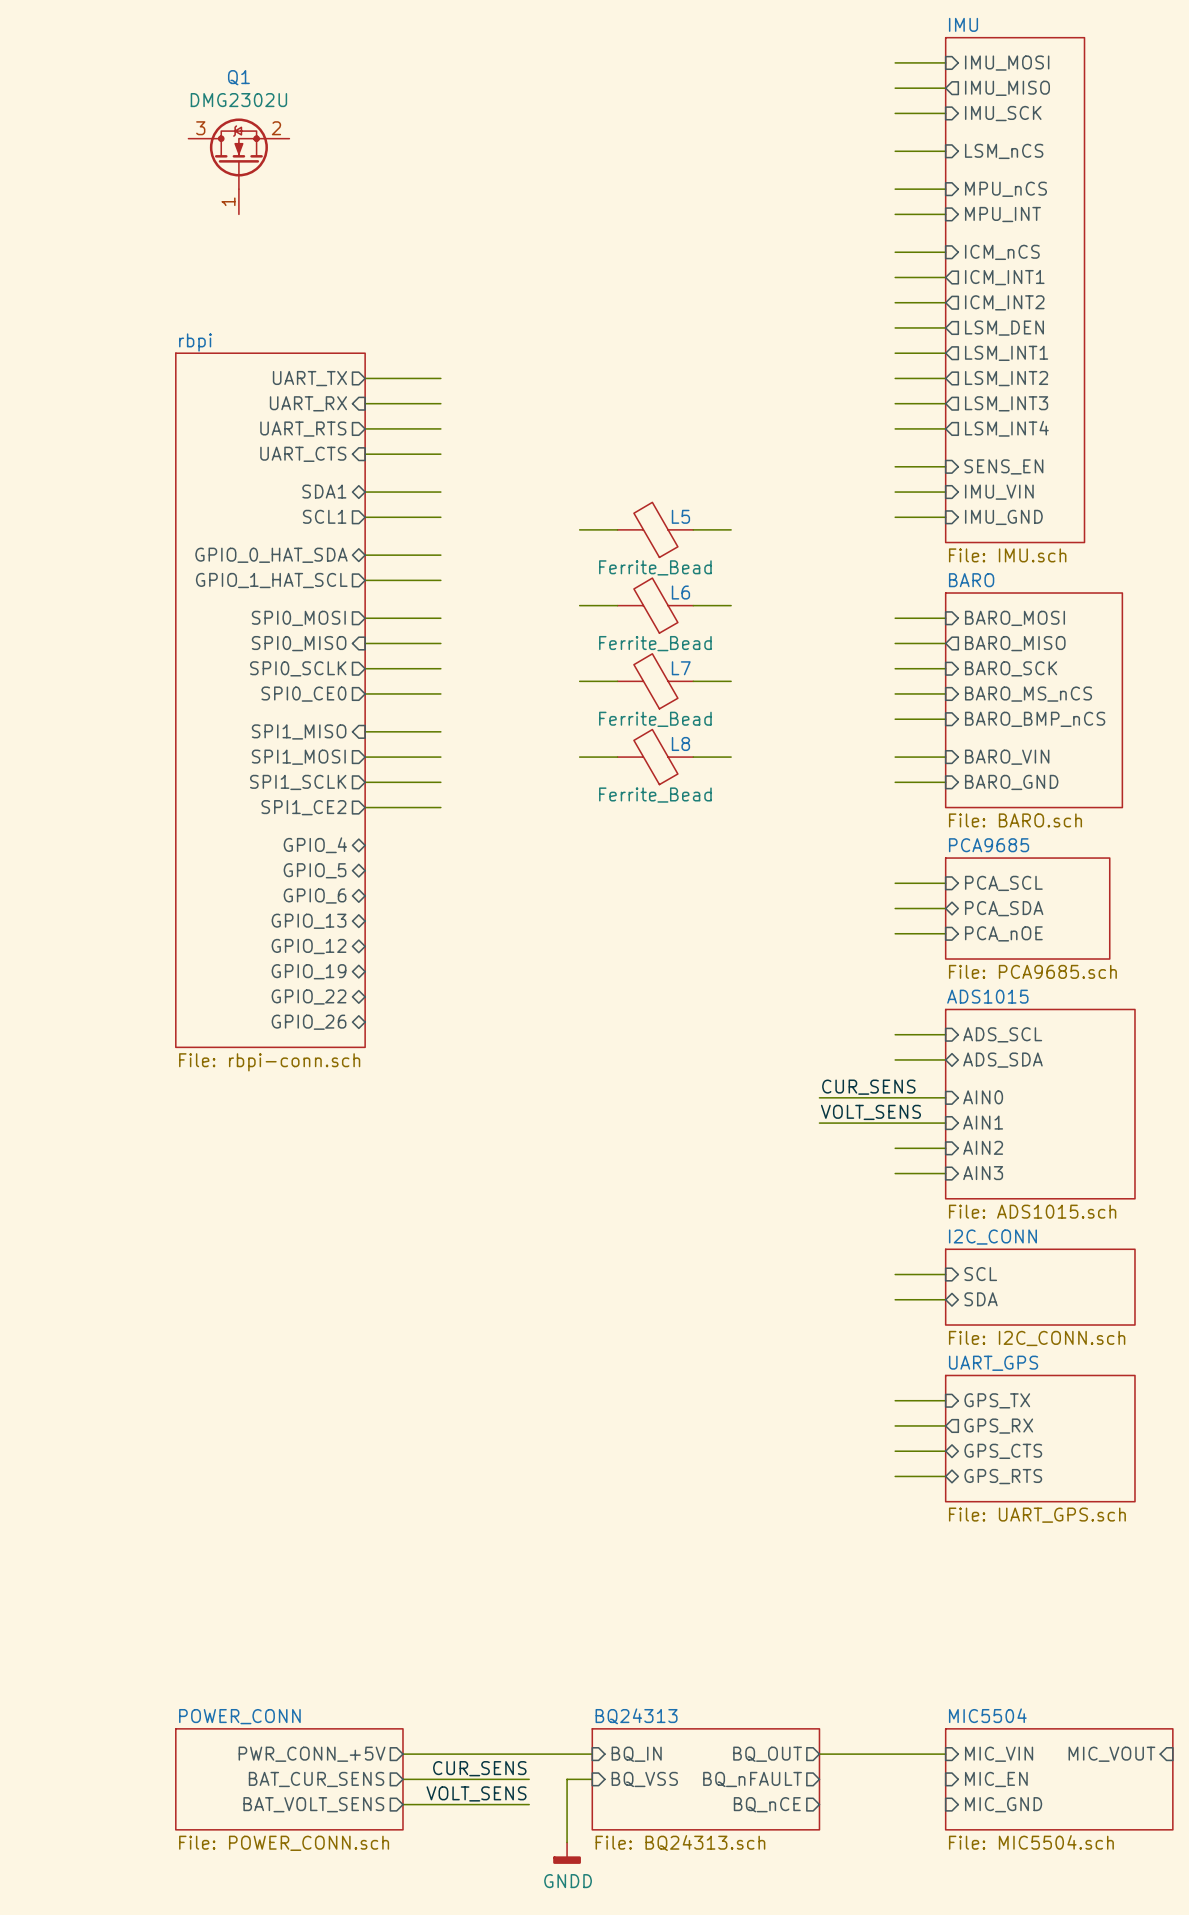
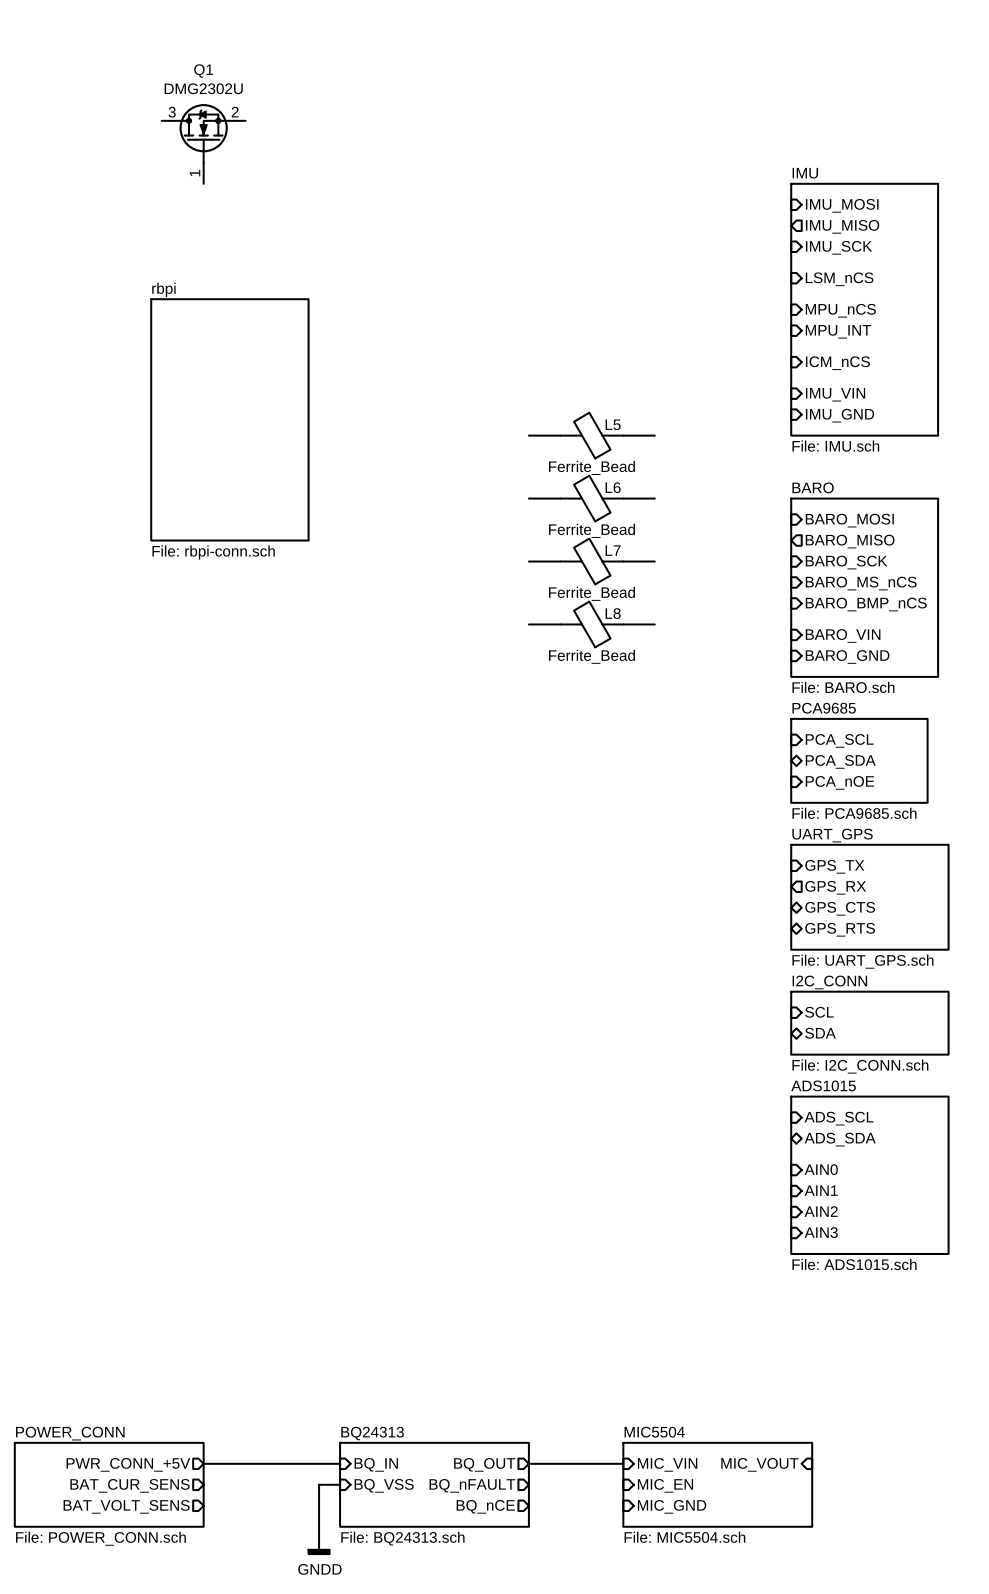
wire: (895, 62) (945, 62) -> none
sheet pin position: IMU_MOSI (1007, 63) -> IMU_MOSI (842, 205)
wire: (895, 88) (945, 88) -> none
sheet pin position: IMU_MISO (1007, 88) -> IMU_MISO (842, 226)
wire: (895, 113) (945, 113) -> none
sheet pin position: IMU_SCK (1003, 113) -> IMU_SCK (839, 247)
wire: (895, 151) (945, 151) -> none
sheet pin: LSM_nCS (1004, 151) -> none
wire: (895, 189) (945, 189) -> none
sheet pin position: MPU_nCS (1005, 189) -> MPU_nCS (840, 310)
wire: (895, 214) (945, 214) -> none
sheet pin position: MPU_INT (1002, 214) -> MPU_INT (838, 331)
wire: (895, 252) (945, 252) -> none
sheet pin: ICM_nCS (1002, 252) -> none
wire: (895, 277) (945, 277) -> none
sheet pin: ICM_INT1 (1004, 277) -> none
sheet IMU: File: IMU.sch (1015, 290) -> none
wire: (895, 302) (945, 302) -> none
sheet pin: ICM_INT2 (1004, 302) -> none
wire: (895, 327) (945, 327) -> none
sheet pin shape: output (1004, 328) -> input (839, 279)
sheet pin: LSM_DEN (1004, 328) -> LSM_nCS (839, 279)
wire: (895, 353) (945, 353) -> none
sheet pin: LSM_INT1 (1006, 353) -> none
sheet IMU: none -> File: IMU.sch (864, 309)
sheet pin: UART_TX (309, 378) -> none
wire: (365, 378) (440, 378) -> none
wire: (895, 378) (945, 378) -> none
sheet pin: LSM_INT2 (1006, 378) -> none
sheet pin: UART_RX (308, 403) -> none
wire: (365, 403) (440, 403) -> none
wire: (895, 403) (945, 403) -> none
sheet pin: LSM_INT3 (1006, 403) -> none
wire: (365, 428) (440, 428) -> none
wire: (895, 428) (945, 428) -> none
sheet pin shape: output (1006, 428) -> input (837, 363)
sheet pin: LSM_INT4 (1006, 428) -> ICM_nCS (837, 363)
sheet pin: UART_RTS (303, 429) -> none
sheet pin: UART_CTS (303, 454) -> none
wire: (365, 454) (440, 454) -> none
wire: (895, 466) (945, 466) -> none
sheet pin: SENS_EN (1003, 466) -> IMU_VIN (835, 394)
sheet pin: SDA1 (324, 491) -> none
wire: (365, 492) (440, 492) -> none
wire: (895, 492) (945, 492) -> none
sheet pin: IMU_VIN (999, 492) -> IMU_GND (840, 415)
sheet rbpi: none -> File: rbpi-conn.sch (229, 419)
sheet pin: SCL1 (324, 516) -> none
wire: (365, 517) (440, 517) -> none
wire: (895, 517) (945, 517) -> none
sheet pin: IMU_GND (1003, 517) -> none
wire: (579, 529) (617, 529) -> (528, 435) (560, 435)
L5 position: (655, 529) -> (591, 435)
wire: (693, 529) (731, 529) -> (623, 435) (654, 435)
sheet pin: GPIO_0_HAT_SDA (271, 555) -> none
wire: (365, 555) (440, 555) -> none
sheet pin: GPIO_1_HAT_SCL (271, 580) -> none
wire: (365, 580) (440, 580) -> none
wire: (579, 605) (617, 605) -> (528, 498) (560, 498)
L6 position: (655, 605) -> (591, 498)
wire: (693, 605) (731, 605) -> (623, 498) (654, 498)
sheet pin: SPI0_MOSI (298, 618) -> none
wire: (365, 618) (440, 618) -> none
wire: (895, 618) (945, 618) -> none
sheet pin: SPI0_MISO (299, 643) -> none
wire: (365, 643) (440, 643) -> none
wire: (895, 643) (945, 643) -> none
sheet pin: SPI0_SCLK (298, 668) -> none
wire: (365, 668) (440, 668) -> none
wire: (895, 668) (945, 668) -> none
wire: (579, 681) (617, 681) -> (528, 561) (560, 561)
L7 position: (655, 681) -> (591, 561)
wire: (693, 681) (731, 681) -> (623, 561) (654, 561)
wire: (365, 693) (440, 693) -> none
wire: (895, 693) (945, 693) -> none
sheet pin: SPI0_CE0 (303, 694) -> none
sheet rbpi: File: rbpi-conn.sch (270, 700) -> none
wire: (895, 719) (945, 719) -> none
sheet pin: SPI1_MISO (299, 731) -> none
wire: (365, 731) (440, 731) -> none
sheet pin: SPI1_MOSI (298, 757) -> none
wire: (365, 757) (440, 757) -> none
wire: (579, 757) (617, 757) -> (528, 624) (560, 624)
L8 position: (655, 757) -> (591, 624)
wire: (693, 757) (731, 757) -> (623, 624) (654, 624)
wire: (895, 757) (945, 757) -> none
sheet pin: SPI1_SCLK (298, 782) -> none
wire: (365, 782) (440, 782) -> none
wire: (895, 782) (945, 782) -> none
sheet pin: SPI1_CE2 (303, 807) -> none
wire: (365, 807) (440, 807) -> none
sheet pin: GPIO_4 (315, 845) -> none
sheet pin: GPIO_5 (315, 870) -> none
wire: (895, 883) (945, 883) -> none
sheet pin: GPIO_6 (315, 896) -> none
wire: (895, 908) (945, 908) -> none
sheet pin: GPIO_13 (309, 921) -> none
wire: (895, 933) (945, 933) -> none
sheet pin: GPIO_12 (309, 946) -> none
sheet pin: GPIO_19 (309, 971) -> none
sheet pin: GPIO_22 (309, 996) -> none
sheet pin: GPIO_26 (309, 1022) -> none
wire: (895, 1034) (945, 1034) -> none
sheet pin: ADS_SCL (1002, 1034) -> GPS_TX (834, 866)
wire: (895, 1059) (945, 1059) -> none
sheet pin shape: bidirectional (1002, 1060) -> output (835, 887)
sheet pin: ADS_SDA (1002, 1060) -> GPS_RX (835, 887)
sheet UART_GPS: none -> File: UART_GPS.sch (869, 897)
sheet pin: none -> GPS_CTS (840, 908)
label: CUR_SENS (868, 1087) -> none
wire: (819, 1097) (945, 1097) -> none
sheet pin: AIN0 (983, 1097) -> none
sheet ADS1015 position: (1040, 1104) -> (869, 1175)
sheet pin: none -> GPS_RTS (840, 929)
label: VOLT_SENS (870, 1112) -> none
sheet pin: AIN1 (983, 1122) -> none
wire: (819, 1123) (945, 1123) -> none
sheet pin: AIN2 (983, 1147) -> none
wire: (895, 1148) (945, 1148) -> none
wire: (895, 1173) (945, 1173) -> none
sheet pin: AIN3 (983, 1173) -> none
wire: (895, 1274) (945, 1274) -> none
sheet pin position: SCL (980, 1274) -> SCL (819, 1012)
sheet I2C_CONN position: (1040, 1287) -> (869, 1023)
wire: (895, 1299) (945, 1299) -> none
sheet pin position: SDA (981, 1299) -> SDA (820, 1033)
sheet pin: none -> ADS_SCL (839, 1118)
sheet pin: none -> ADS_SDA (840, 1139)
wire: (895, 1400) (945, 1400) -> none
sheet pin: GPS_TX (997, 1400) -> AIN0 (821, 1169)
wire: (895, 1425) (945, 1425) -> none
sheet pin shape: output (998, 1426) -> input (821, 1190)
sheet pin: GPS_RX (998, 1426) -> AIN1 (821, 1190)
sheet UART_GPS: File: UART_GPS.sch (1040, 1438) -> none
wire: (895, 1451) (945, 1451) -> none
sheet pin shape: bidirectional (1003, 1451) -> input (821, 1211)
sheet pin: GPS_CTS (1003, 1451) -> AIN2 (821, 1211)
wire: (895, 1476) (945, 1476) -> none
sheet pin shape: bidirectional (1003, 1476) -> input (821, 1232)
sheet pin: GPS_RTS (1003, 1476) -> AIN3 (821, 1232)
sheet pin position: PWR_CONN_+5V (312, 1754) -> PWR_CONN_+5V (128, 1464)
wire: (402, 1754) (592, 1754) -> (340, 1463) (203, 1463)
wire: none -> (528, 1463) (623, 1463)
sheet pin position: BQ_IN (636, 1754) -> BQ_IN (376, 1464)
sheet pin position: BQ_OUT (767, 1754) -> BQ_OUT (484, 1464)
wire: (819, 1754) (945, 1754) -> none
sheet pin position: MIC_VIN (999, 1754) -> MIC_VIN (667, 1464)
sheet pin position: MIC_VOUT (1111, 1754) -> MIC_VOUT (759, 1464)
label: CUR_SENS (479, 1768) -> none
sheet POWER_CONN position: (289, 1779) -> (109, 1484)
sheet pin position: BAT_CUR_SENS (316, 1779) -> BAT_CUR_SENS (130, 1485)
wire: (402, 1779) (529, 1779) -> (340, 1484) (319, 1484) (319, 1537)
wire: (592, 1779) (567, 1779) (567, 1842) -> none
sheet pin position: BQ_VSS (644, 1779) -> BQ_VSS (384, 1485)
sheet BQ24313 position: (705, 1779) -> (434, 1484)
sheet pin position: BQ_nFAULT (752, 1779) -> BQ_nFAULT (472, 1485)
sheet pin position: MIC_EN (996, 1779) -> MIC_EN (665, 1485)
sheet MIC5504 position: (1059, 1779) -> (717, 1484)
label: VOLT_SENS (476, 1793) -> none
sheet pin position: BAT_VOLT_SENS (313, 1804) -> BAT_VOLT_SENS (126, 1506)
wire: (402, 1804) (529, 1804) -> none
sheet pin position: BQ_nCE (767, 1804) -> BQ_nCE (485, 1506)
sheet pin position: MIC_GND (1003, 1804) -> MIC_GND (672, 1506)
power symbol position: GNDD (567, 1853) -> GNDD (319, 1546)

